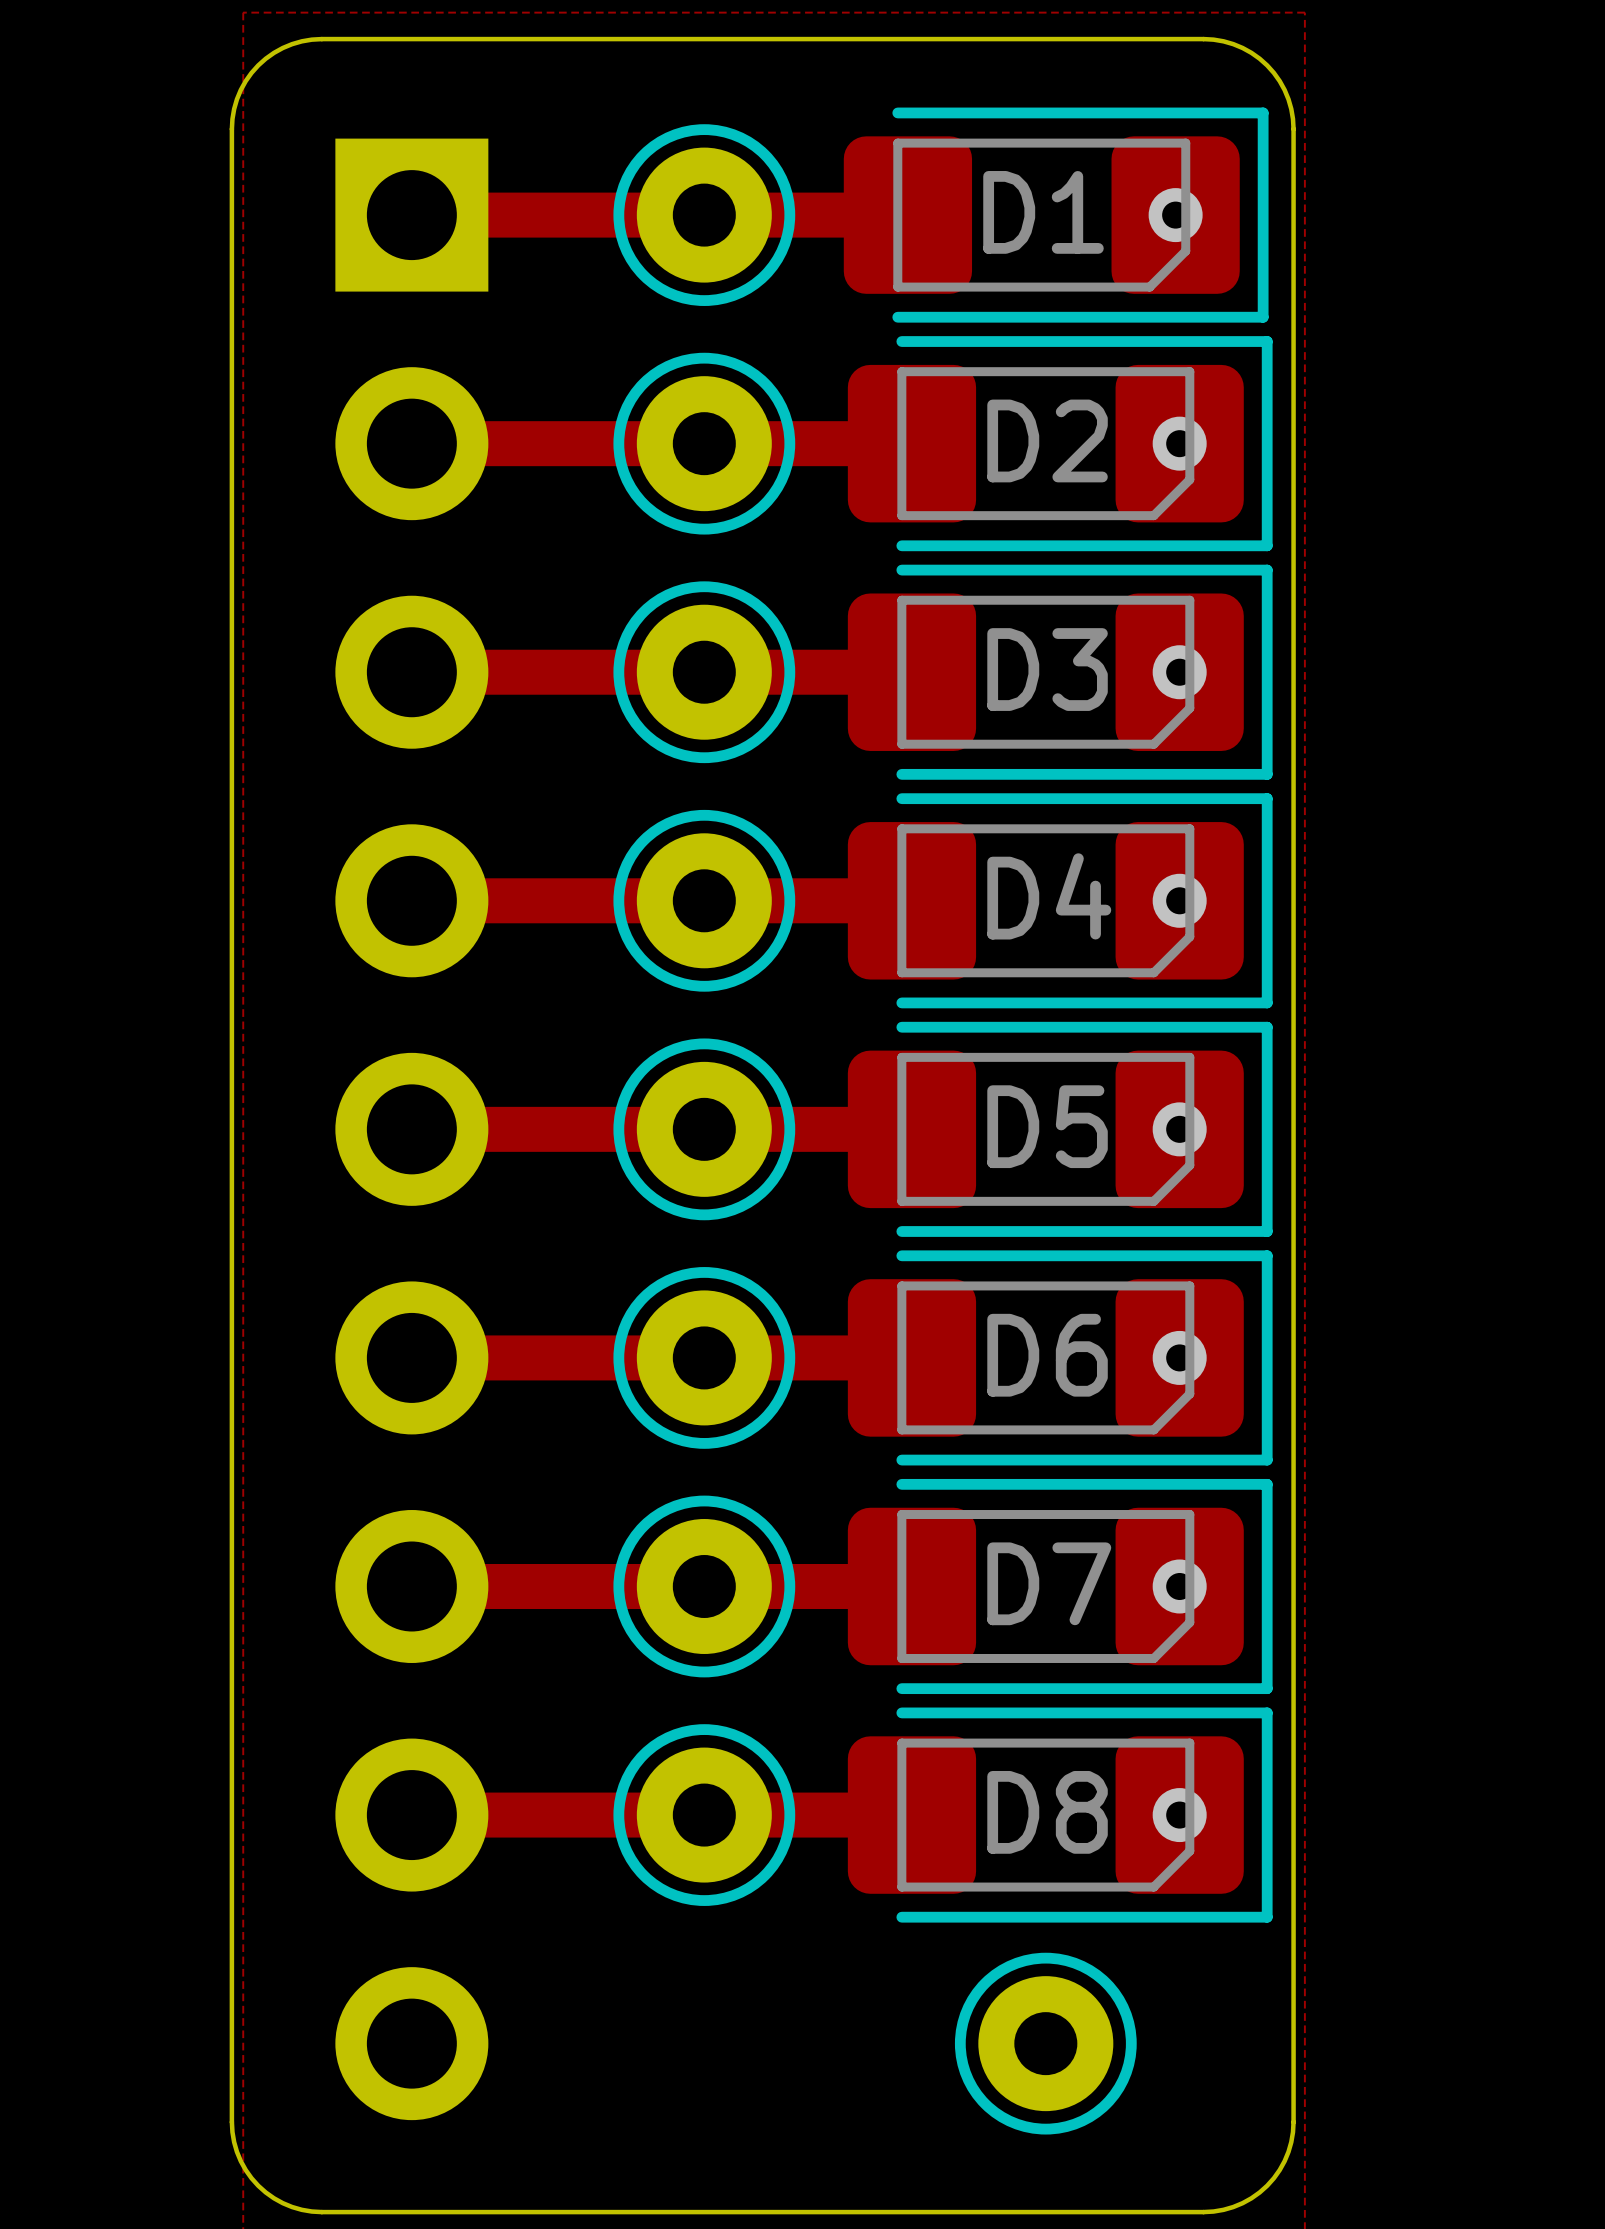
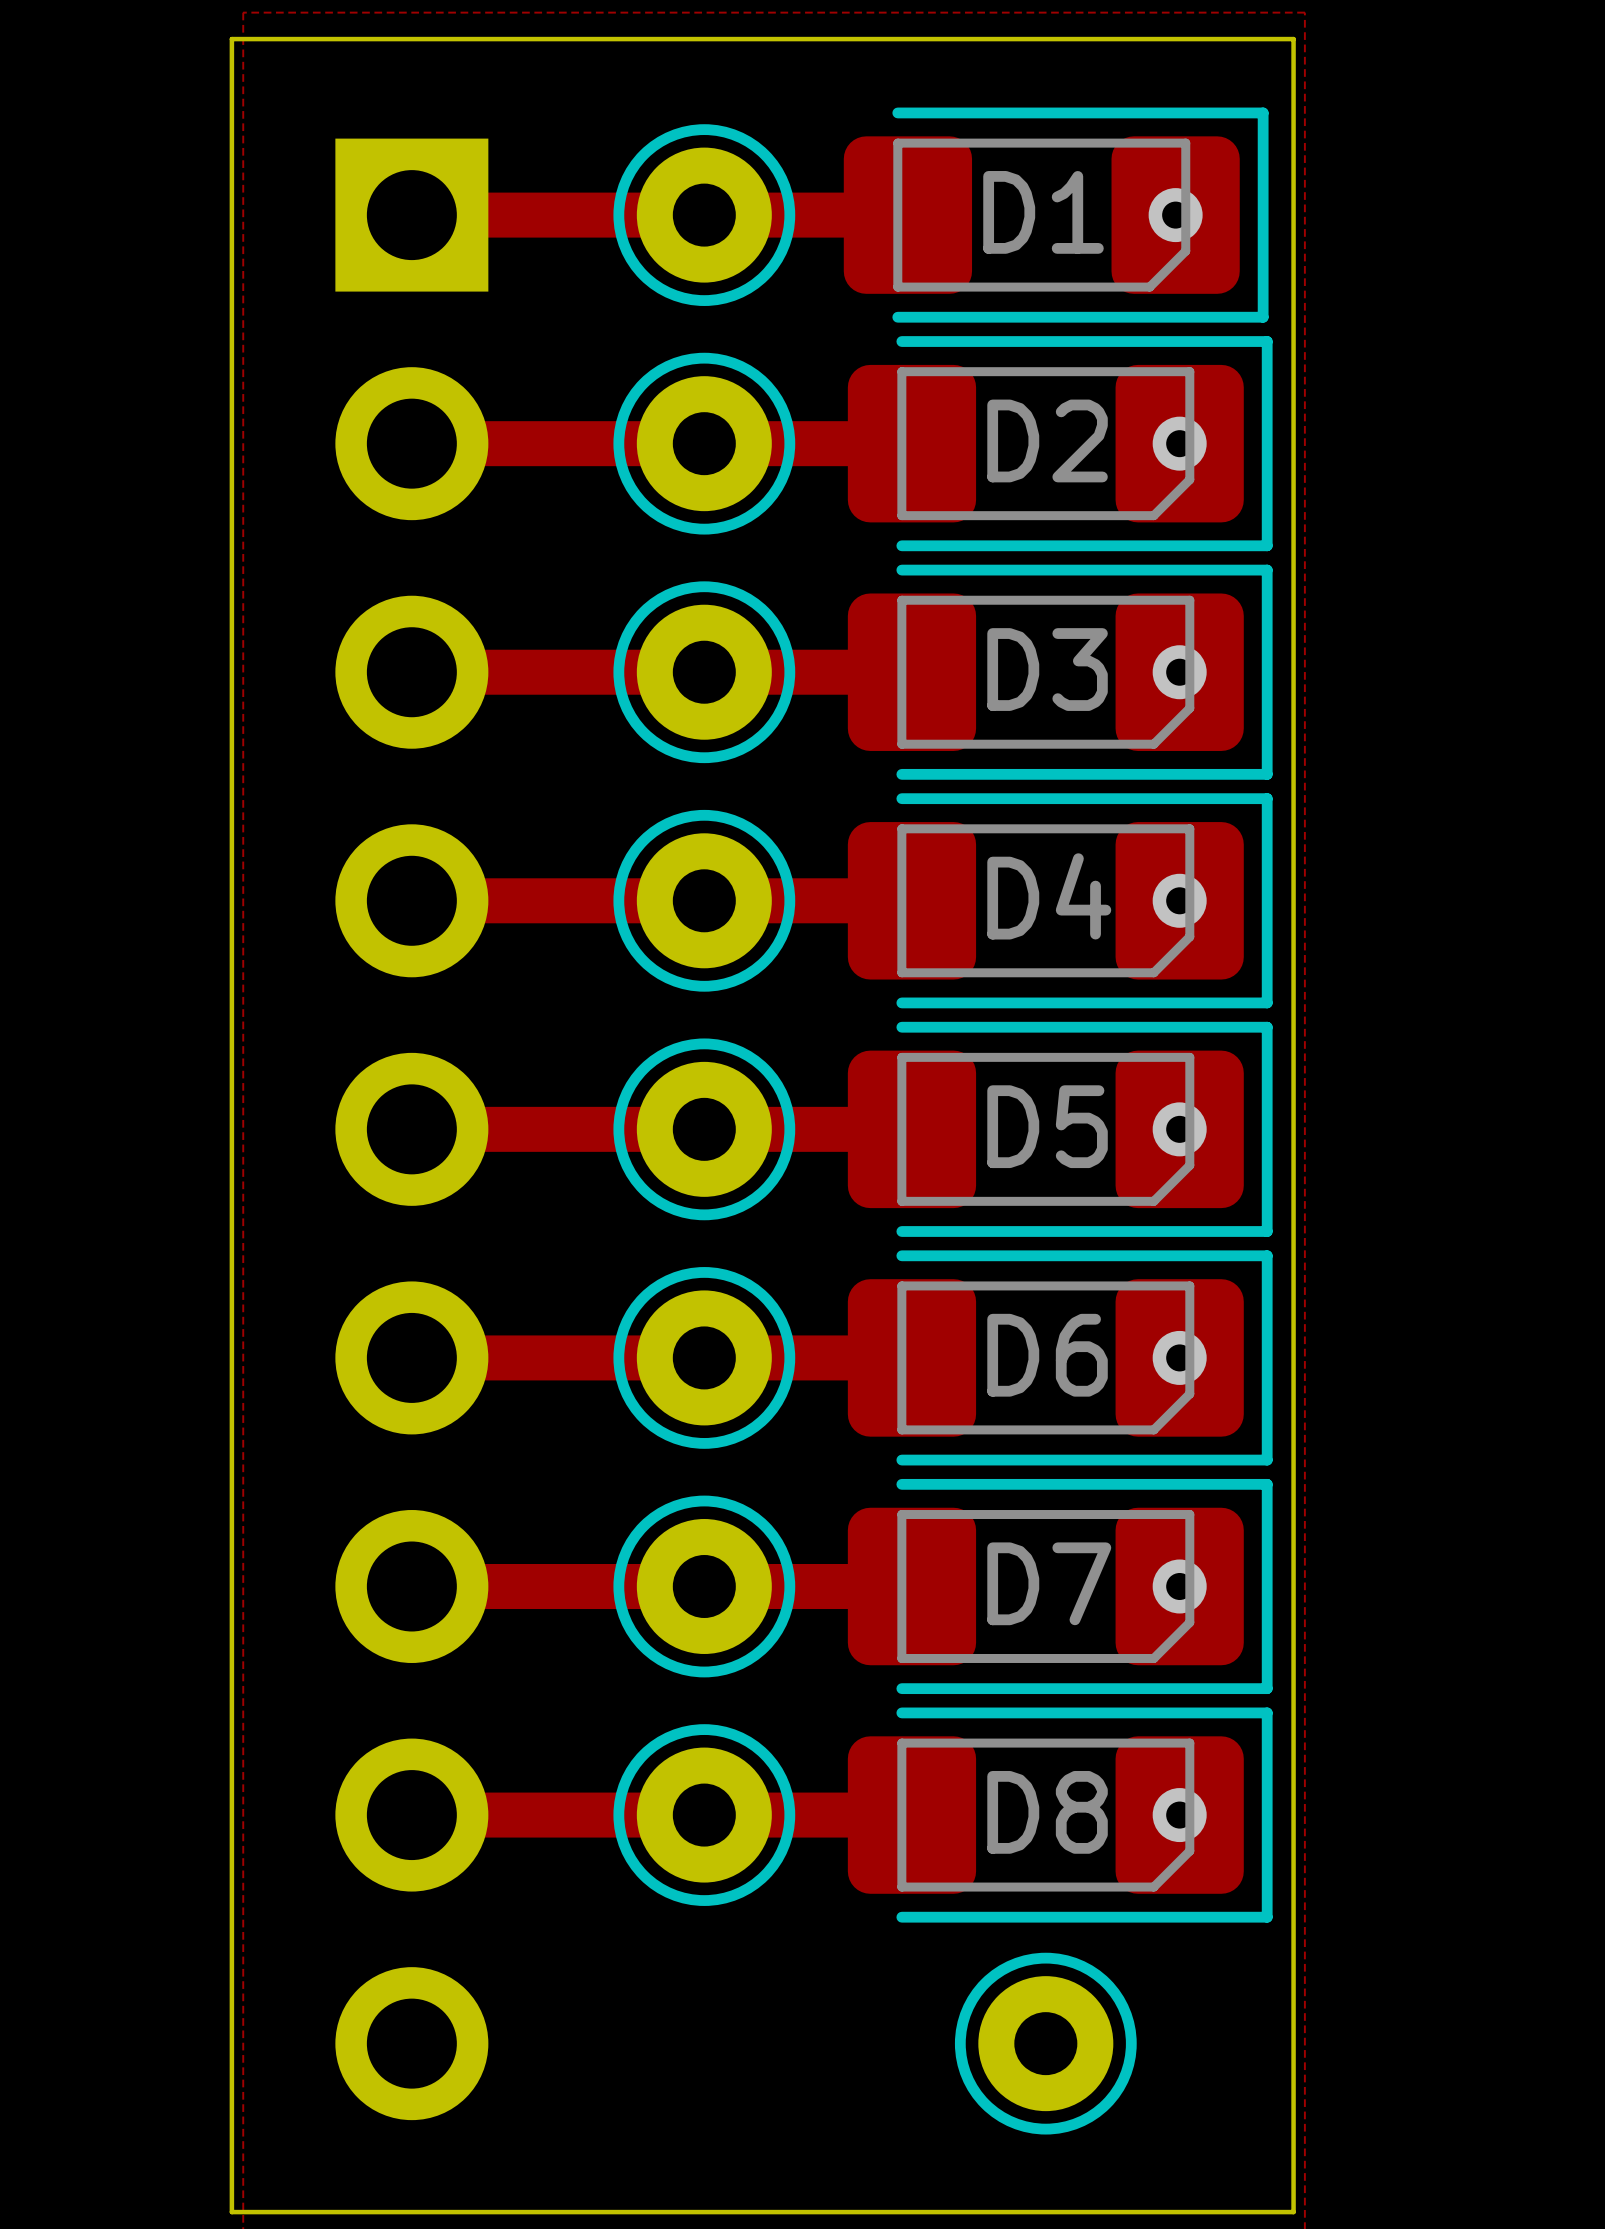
board edge: (321, 39) (301, 41) (282, 47) (258, 65) (245, 81) (236, 99) (231, 129) -> (321, 39) (231, 39) (231, 129)
board edge: (1203, 39) (1223, 41) (1242, 47) (1267, 65) (1279, 81) (1288, 99) (1293, 129) -> (1203, 39) (1293, 39) (1293, 129)
board edge: (231, 2122) (234, 2142) (240, 2161) (258, 2185) (274, 2198) (292, 2207) (321, 2212) -> (231, 2122) (231, 2212) (321, 2212)
board edge: (1293, 2122) (1291, 2142) (1284, 2161) (1267, 2185) (1242, 2203) (1223, 2209) (1203, 2212) -> (1293, 2122) (1293, 2212) (1203, 2212)

